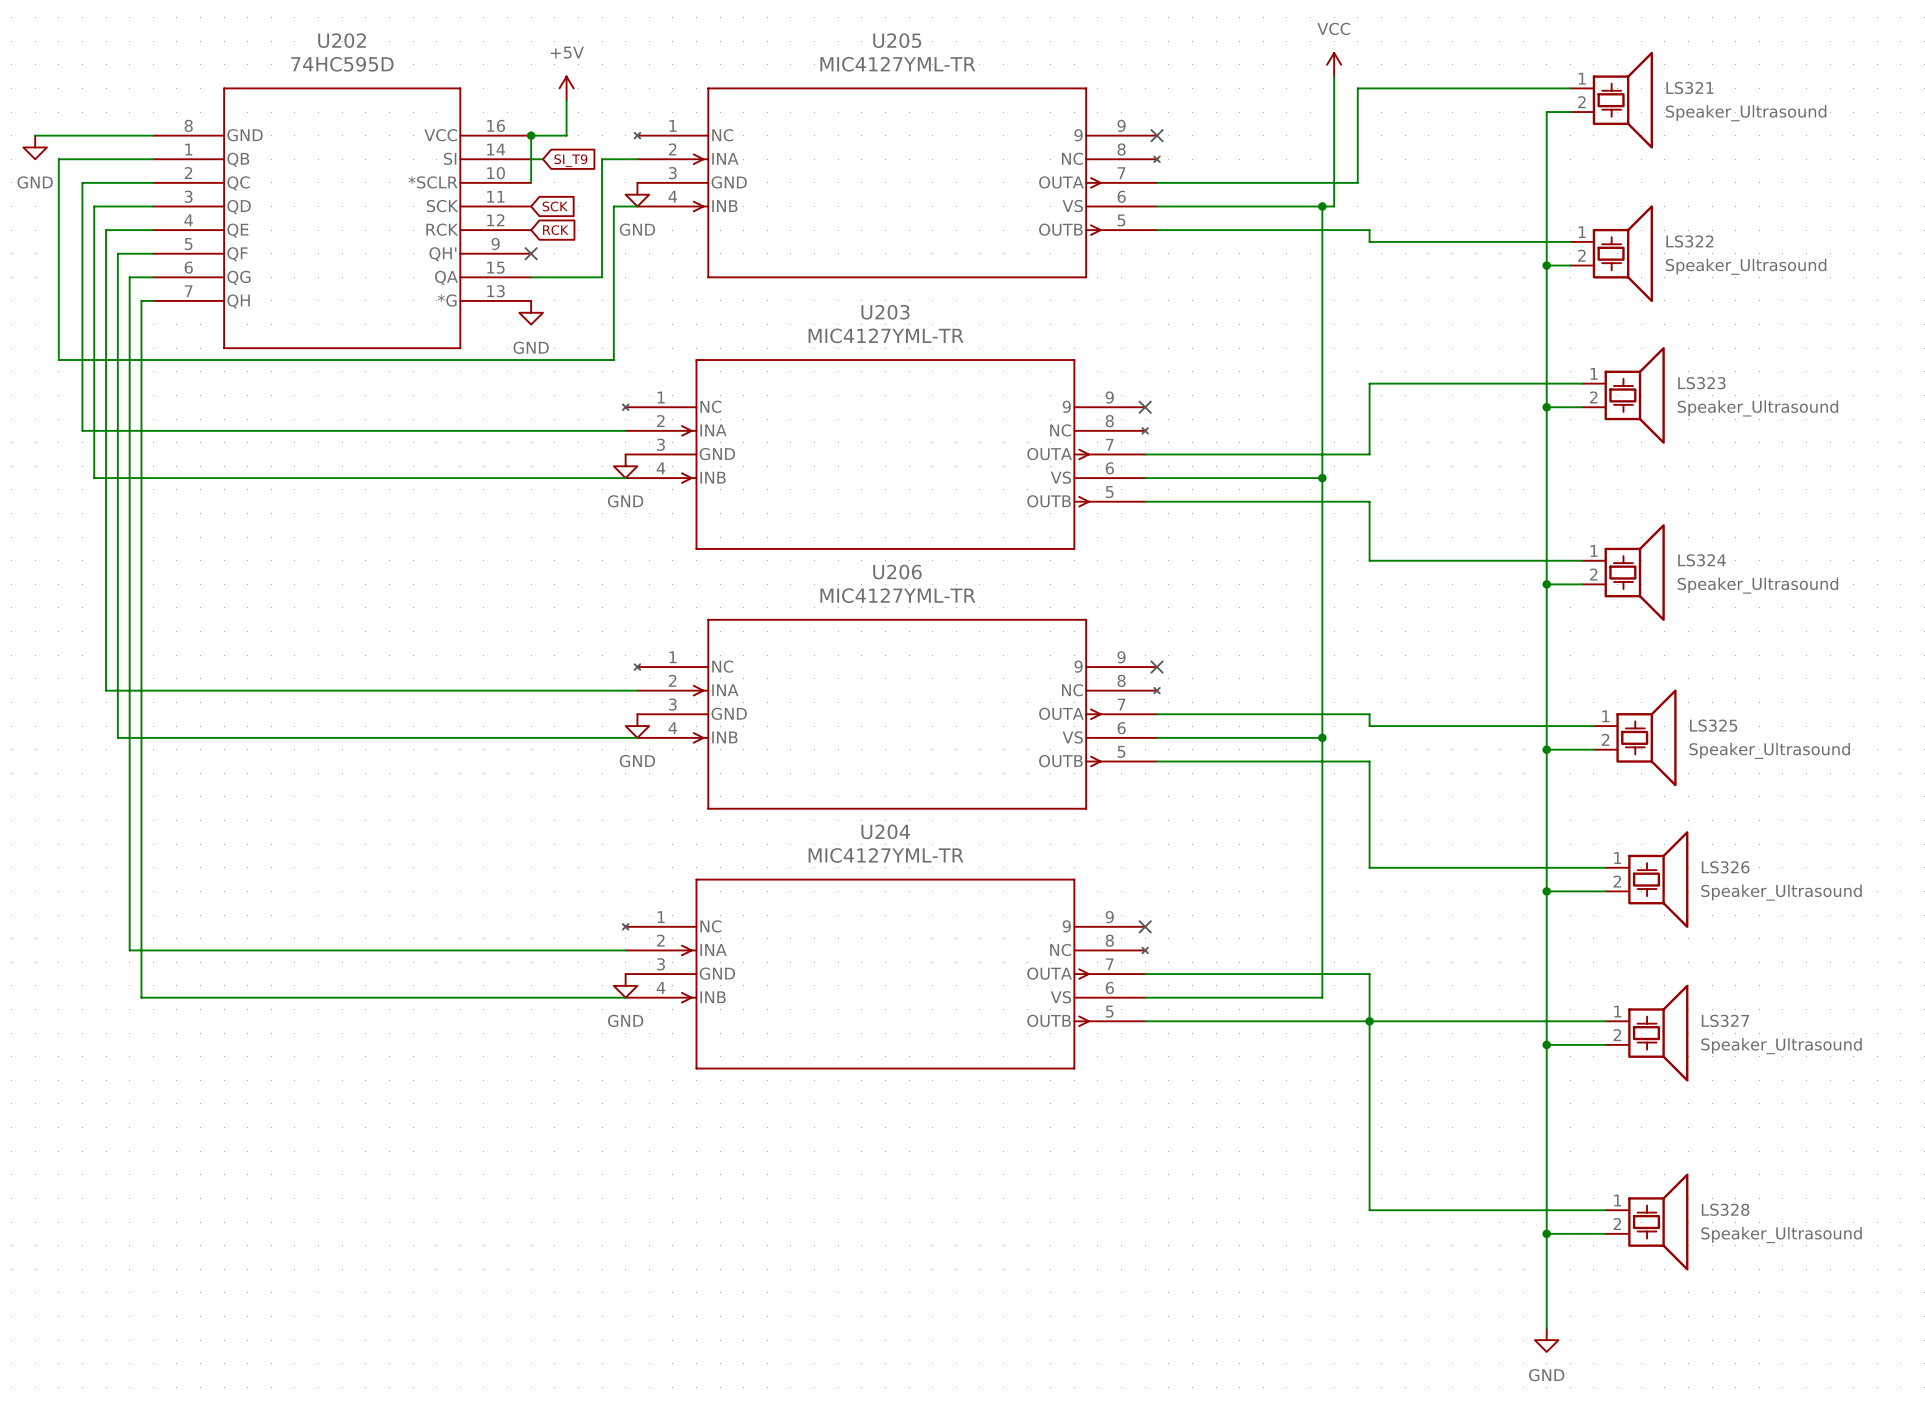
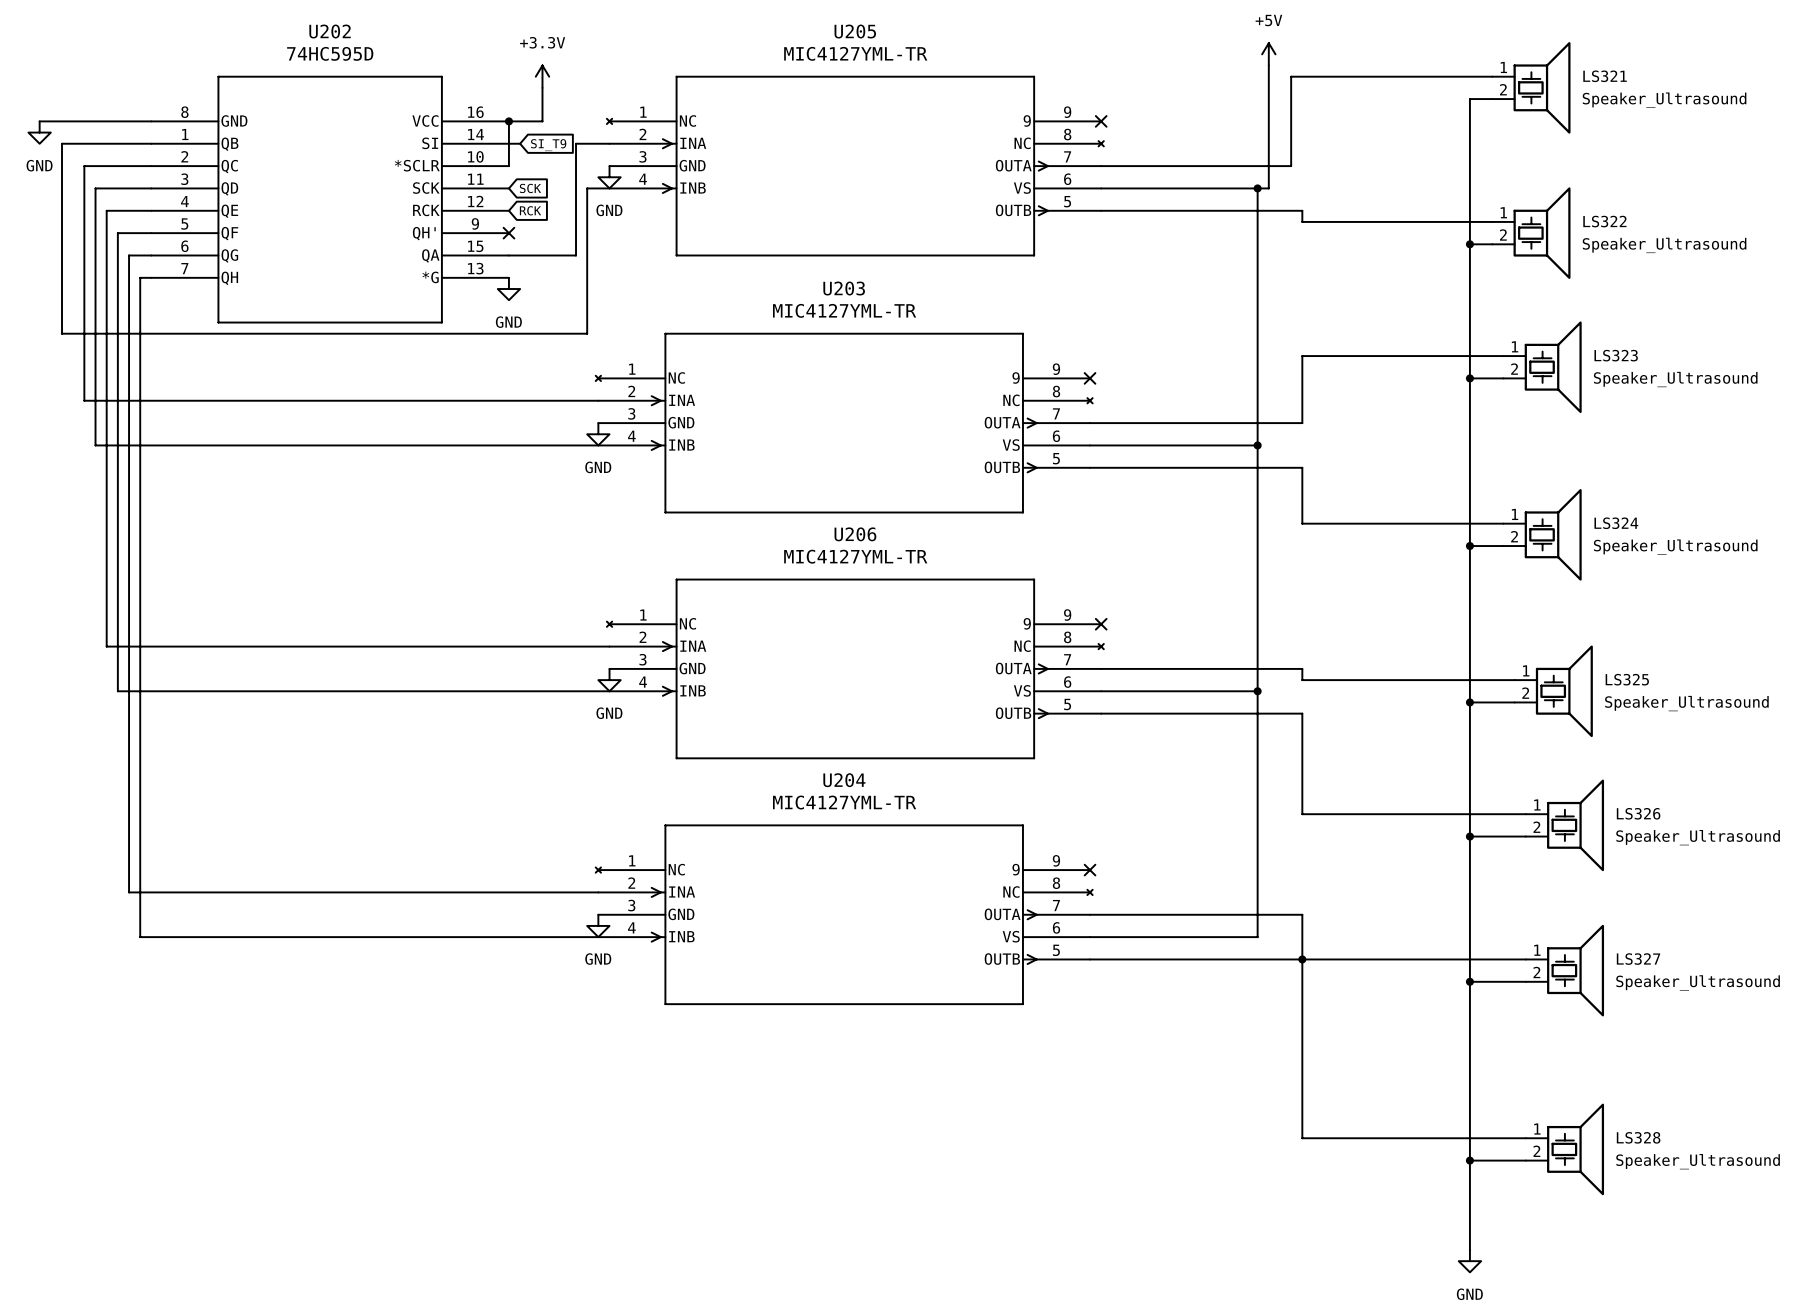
power symbol: VCC (1334, 64) -> +5V (1268, 54)
power symbol: +5V (566, 88) -> +3.3V (542, 76)

